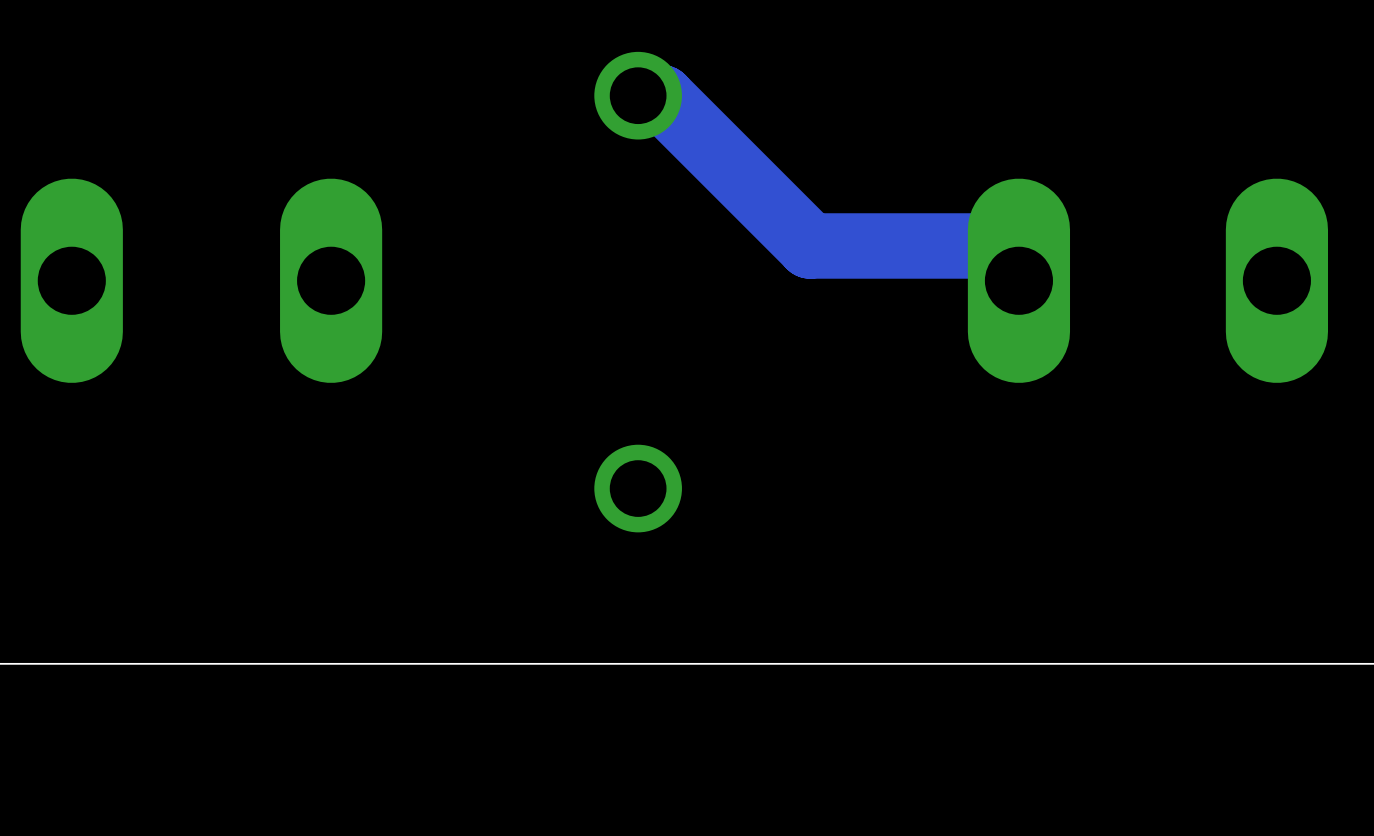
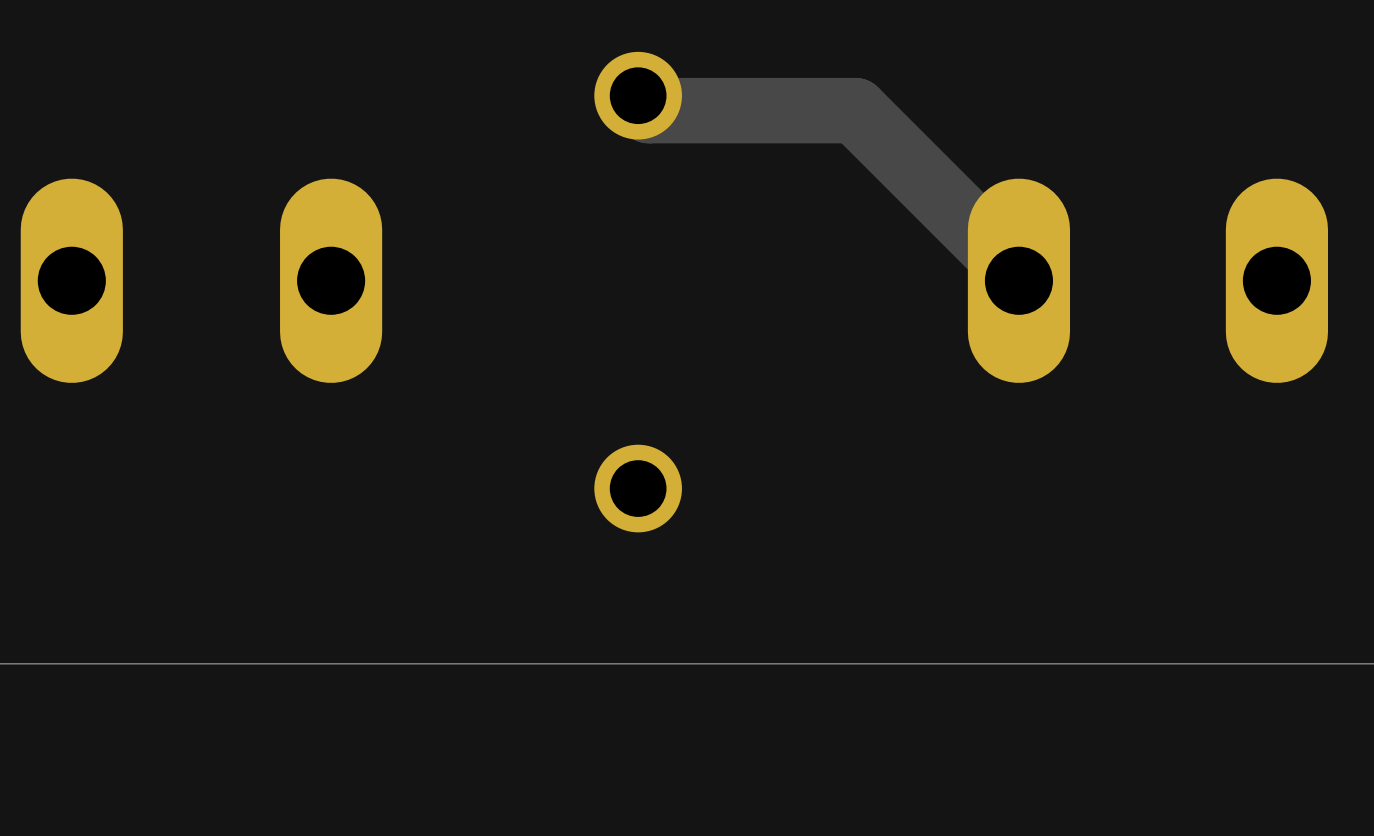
track: (638, 95) (642, 97) (661, 97) (810, 245) (984, 245) (1018, 280) -> (638, 95) (648, 110) (855, 110) (1009, 265) (1018, 280)

